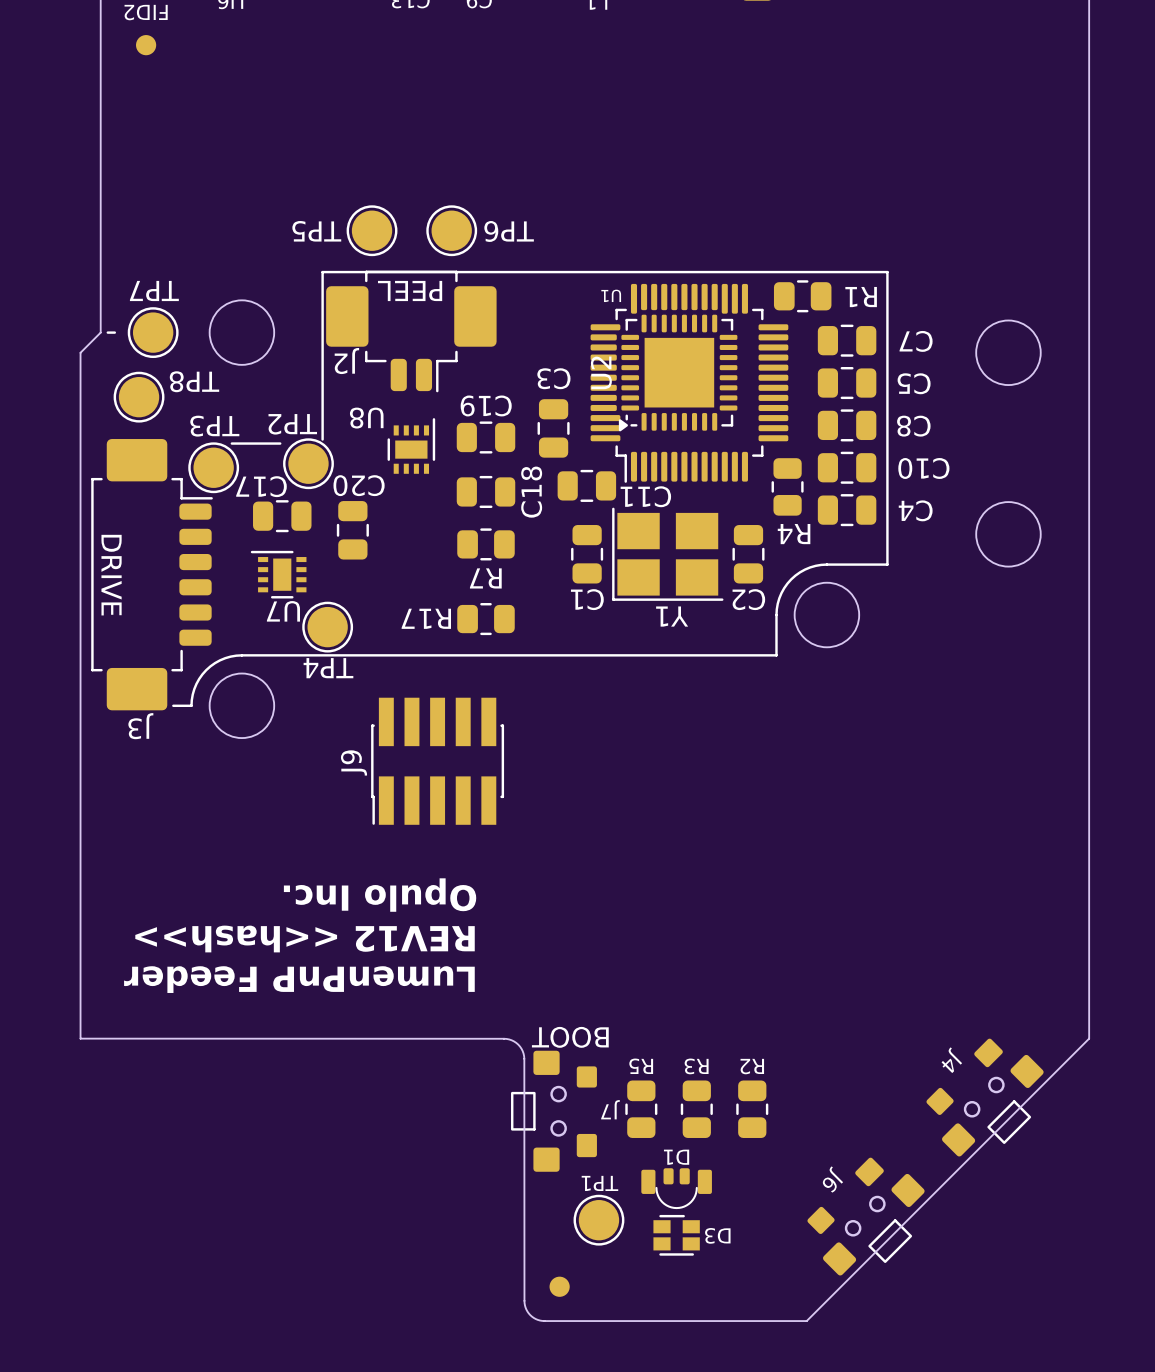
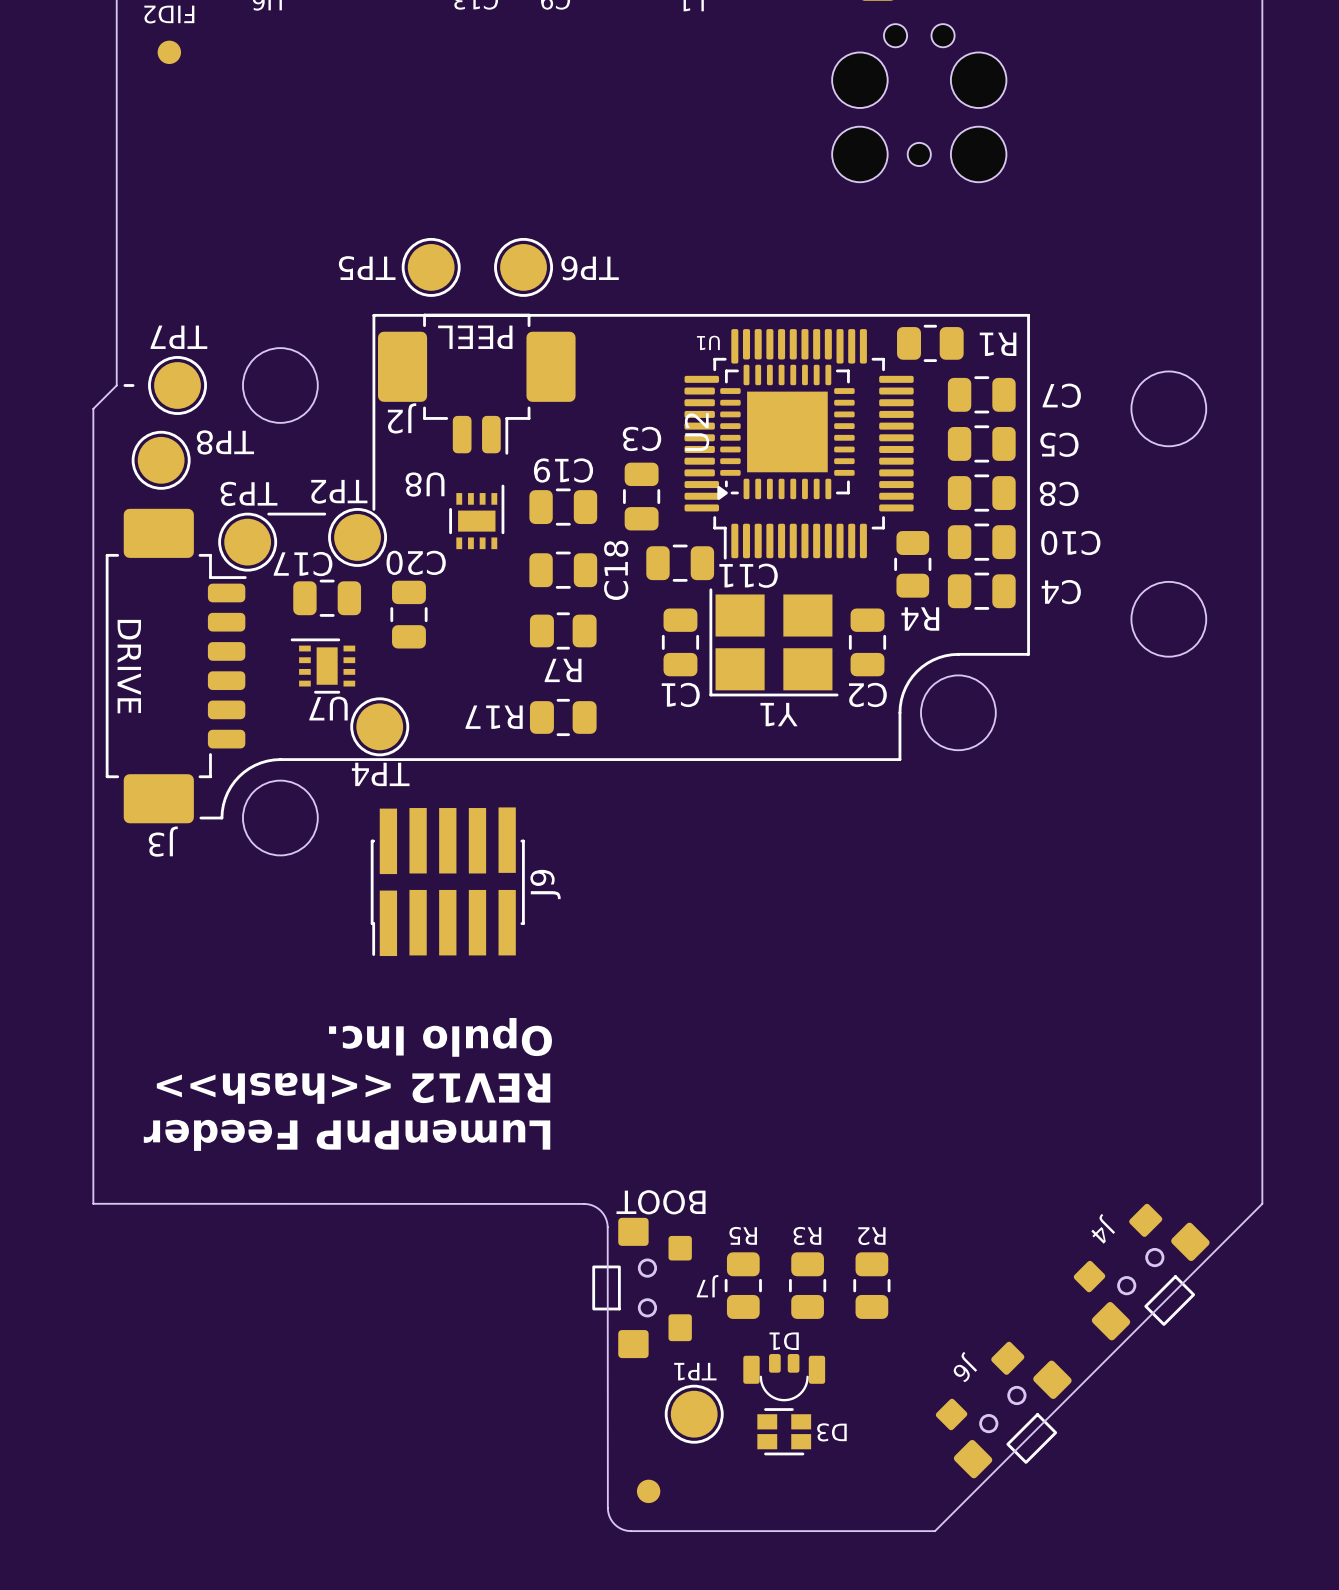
part: none -> (919, 103)
J9 footprint: [371, 697, 505, 825] -> [370, 807, 525, 957]
J9 name position: J9 (353, 762) -> J9 (545, 884)

